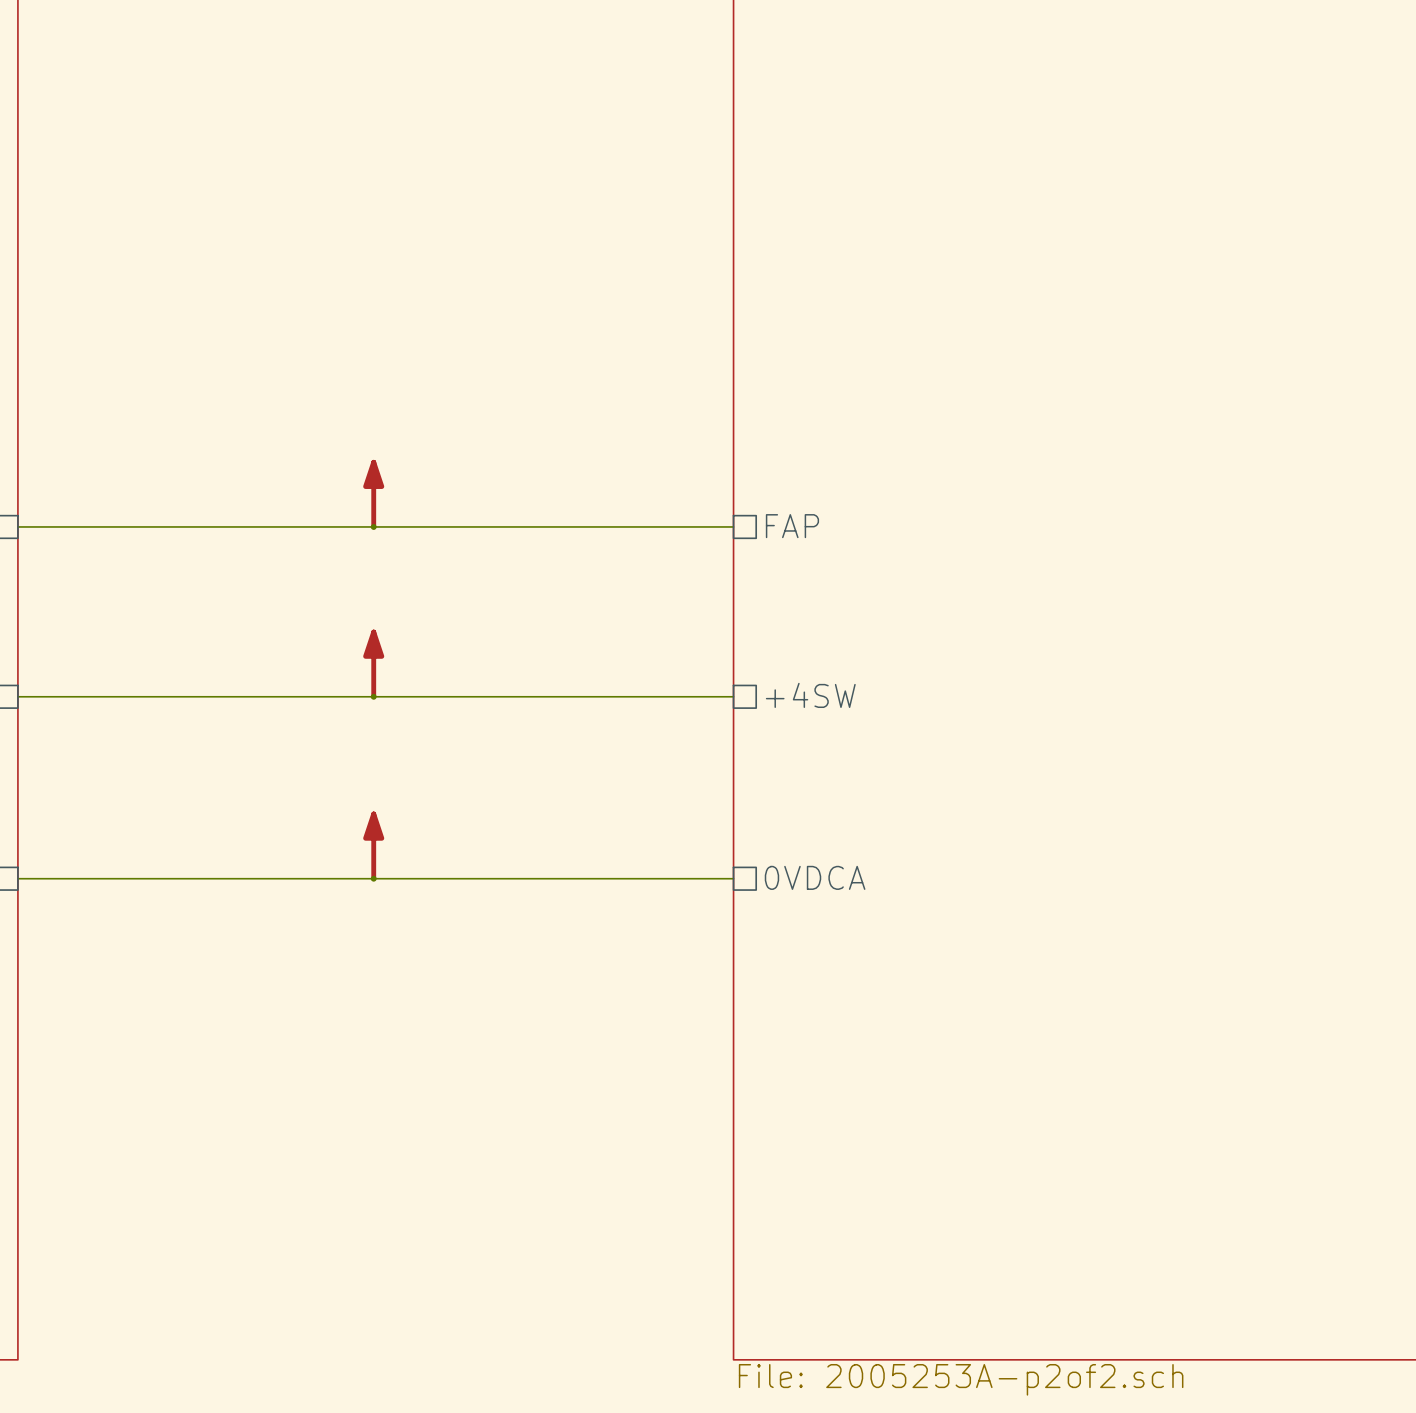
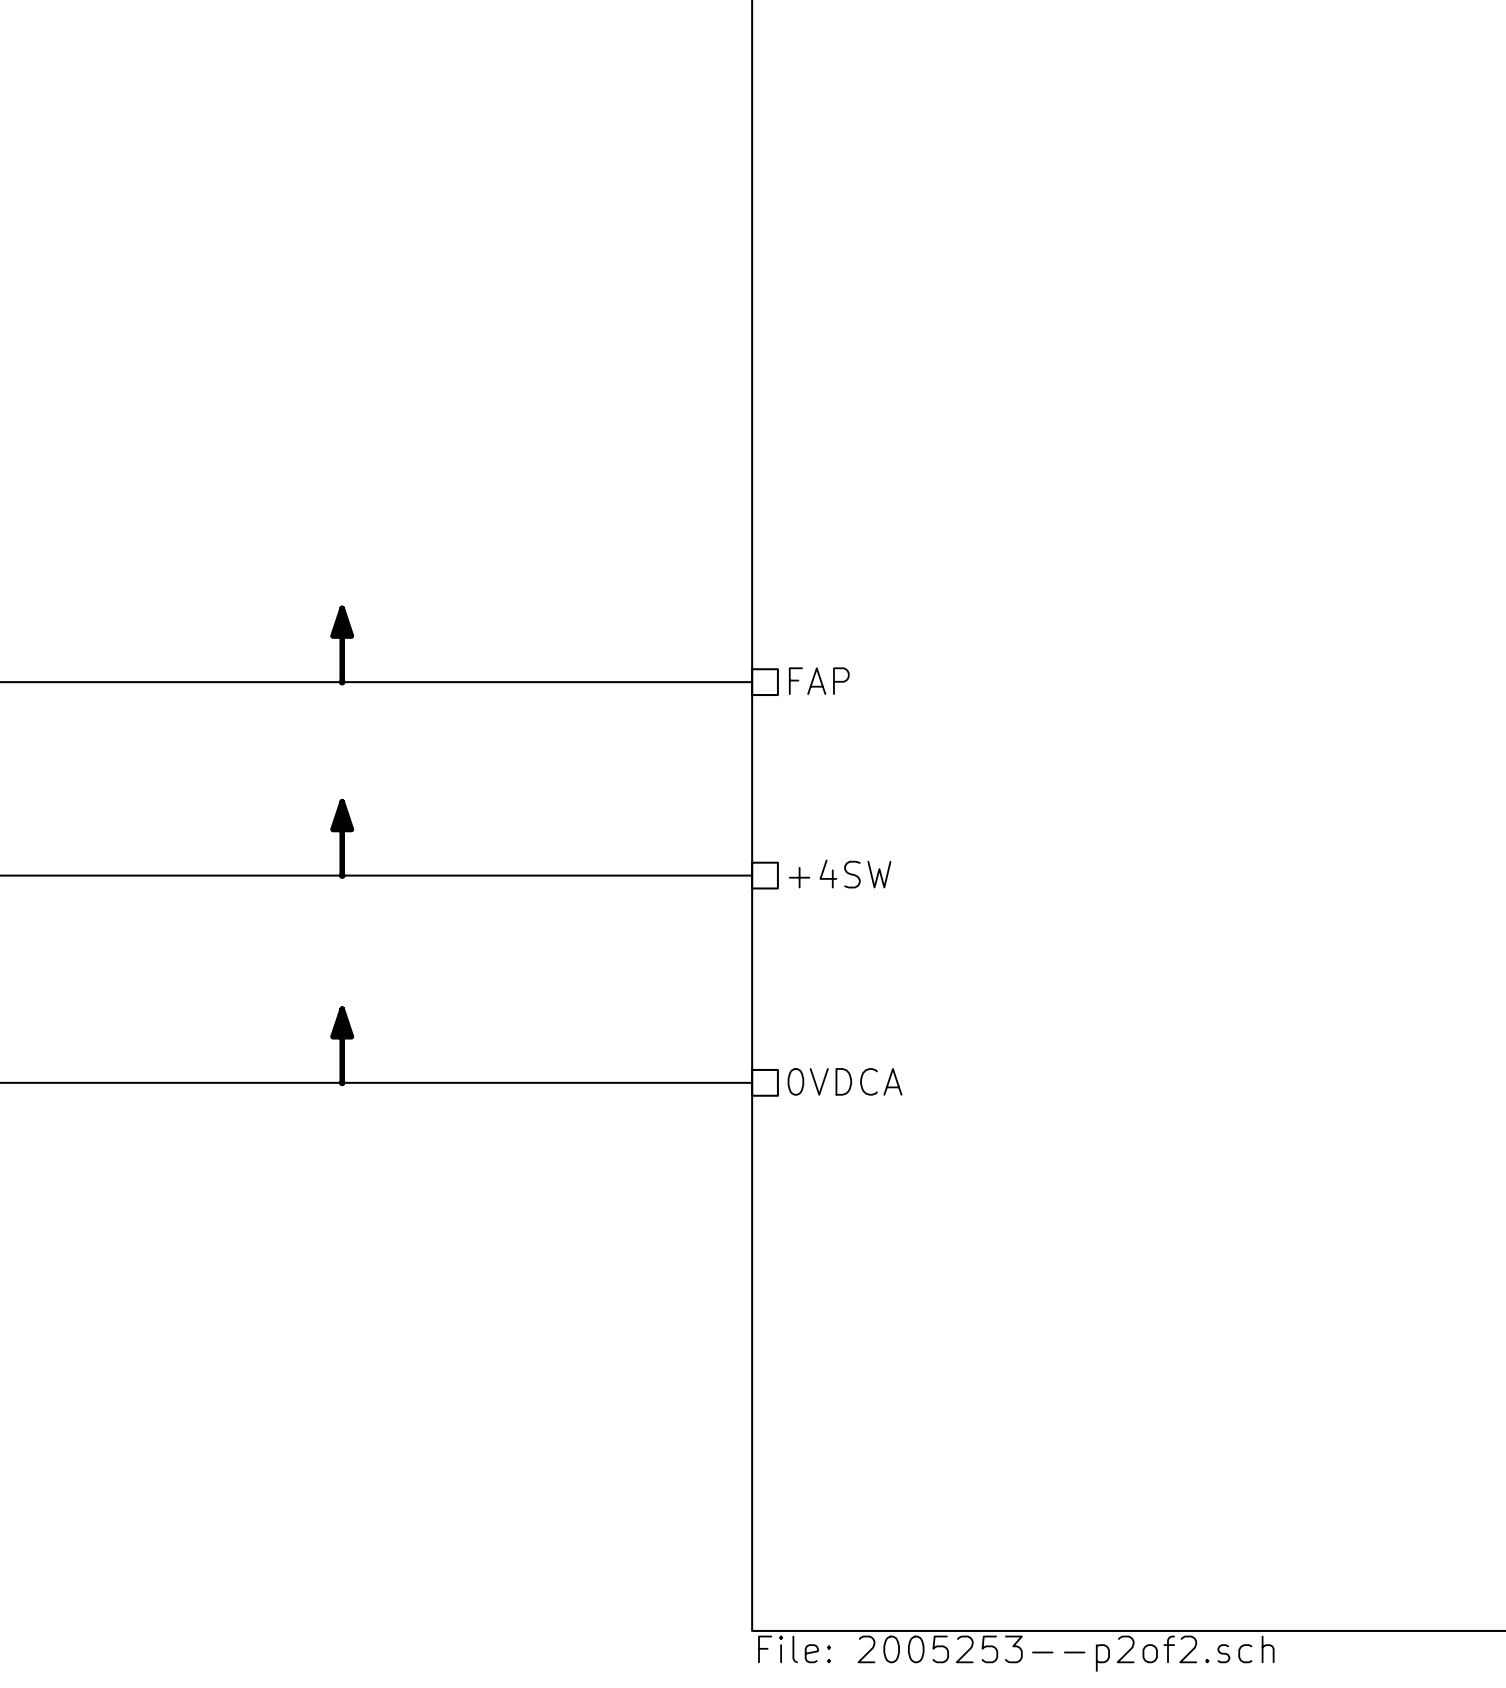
sheet value: File: 2005253A-p2of2.sch (961, 1379) -> File: 2005253--p2of2.sch (1016, 1653)

